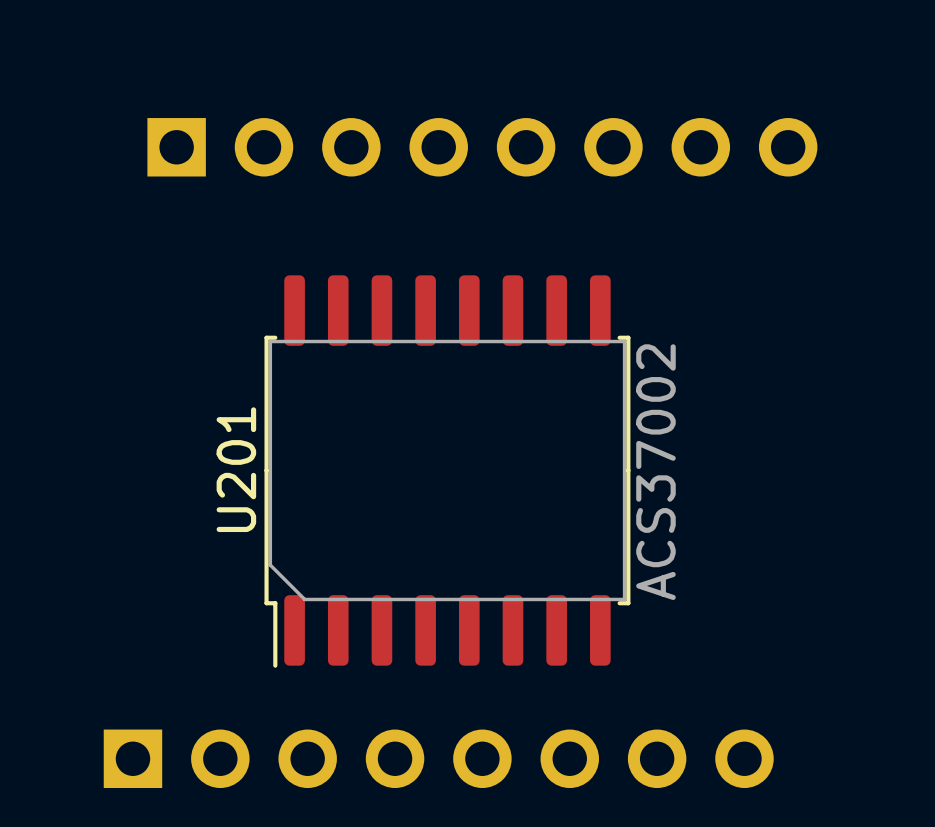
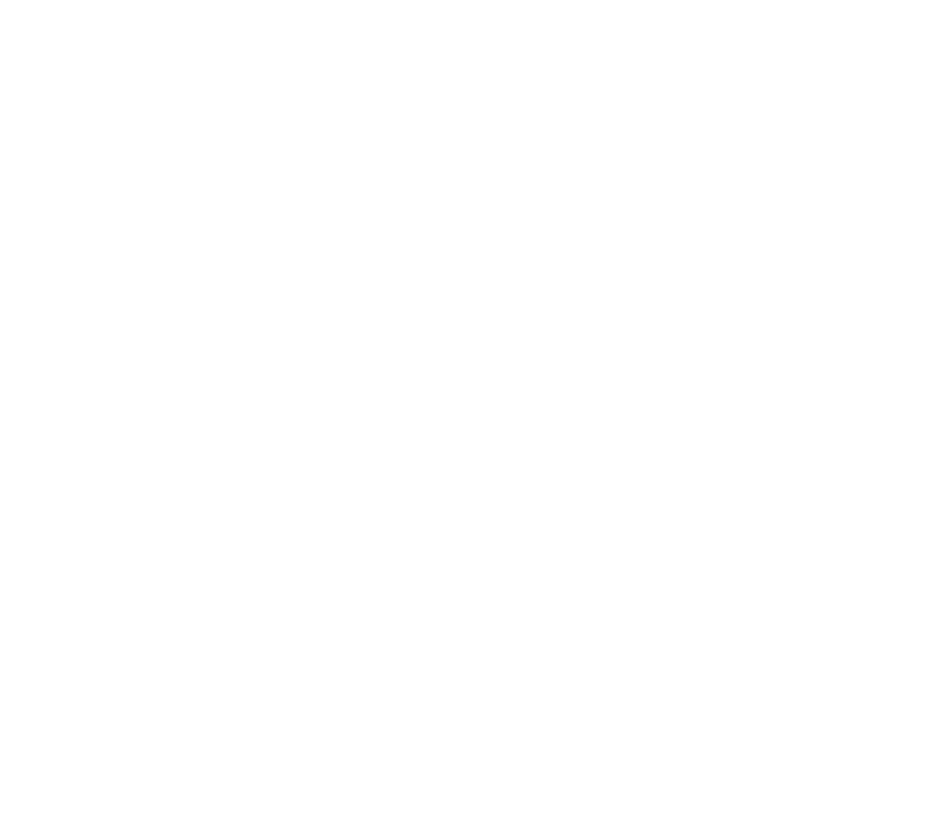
part: (482, 147) -> none
U201: ACS37002 (447, 471) -> none
part: (438, 758) -> none

